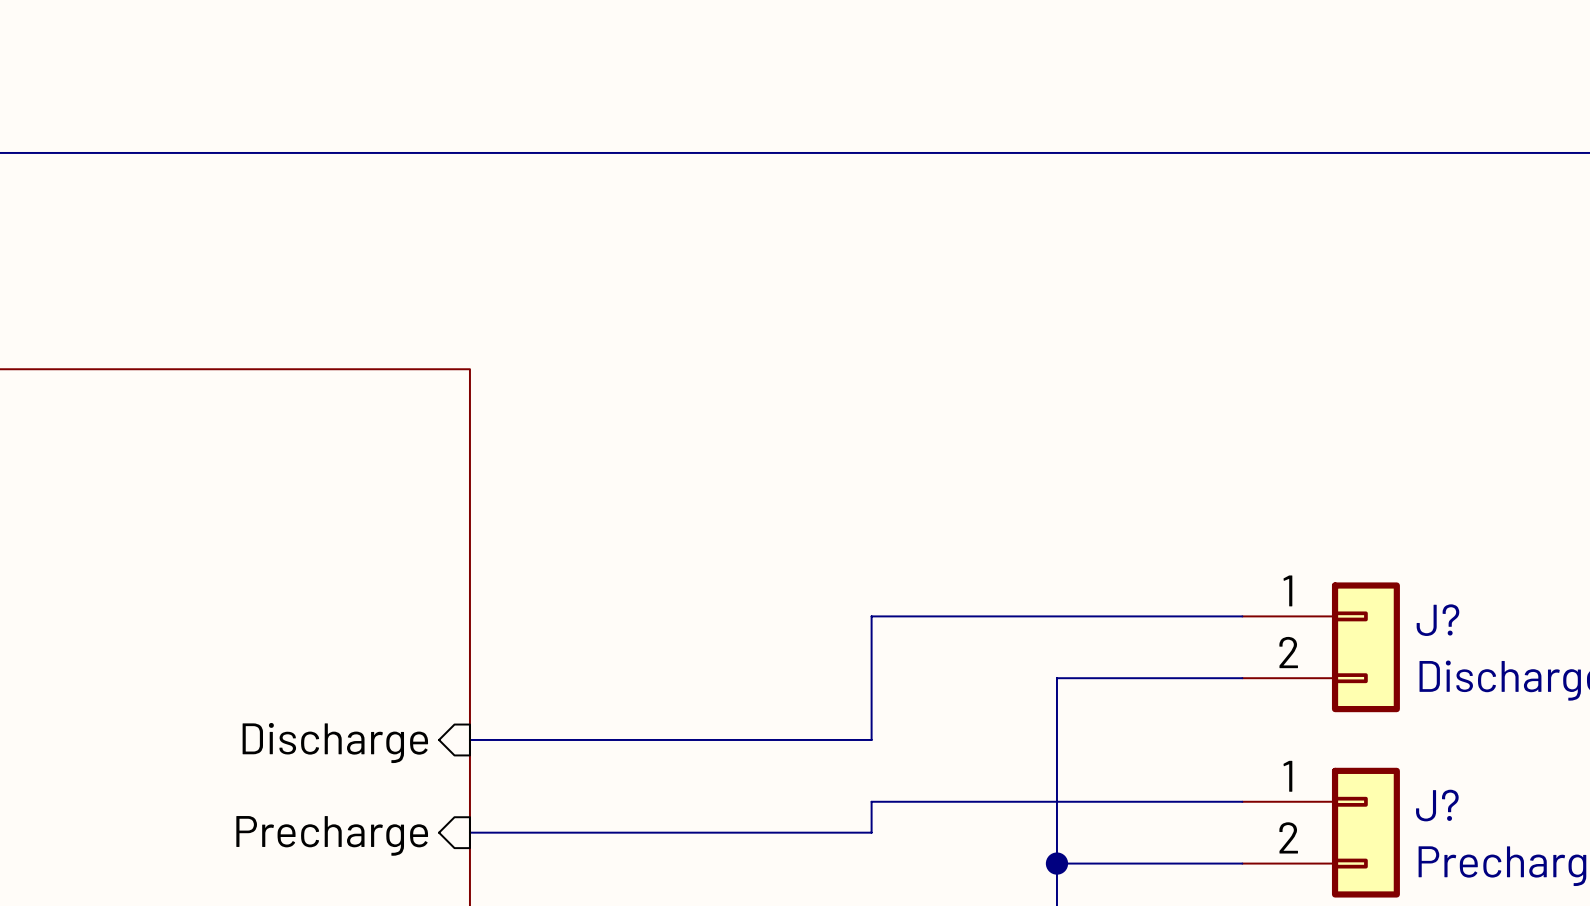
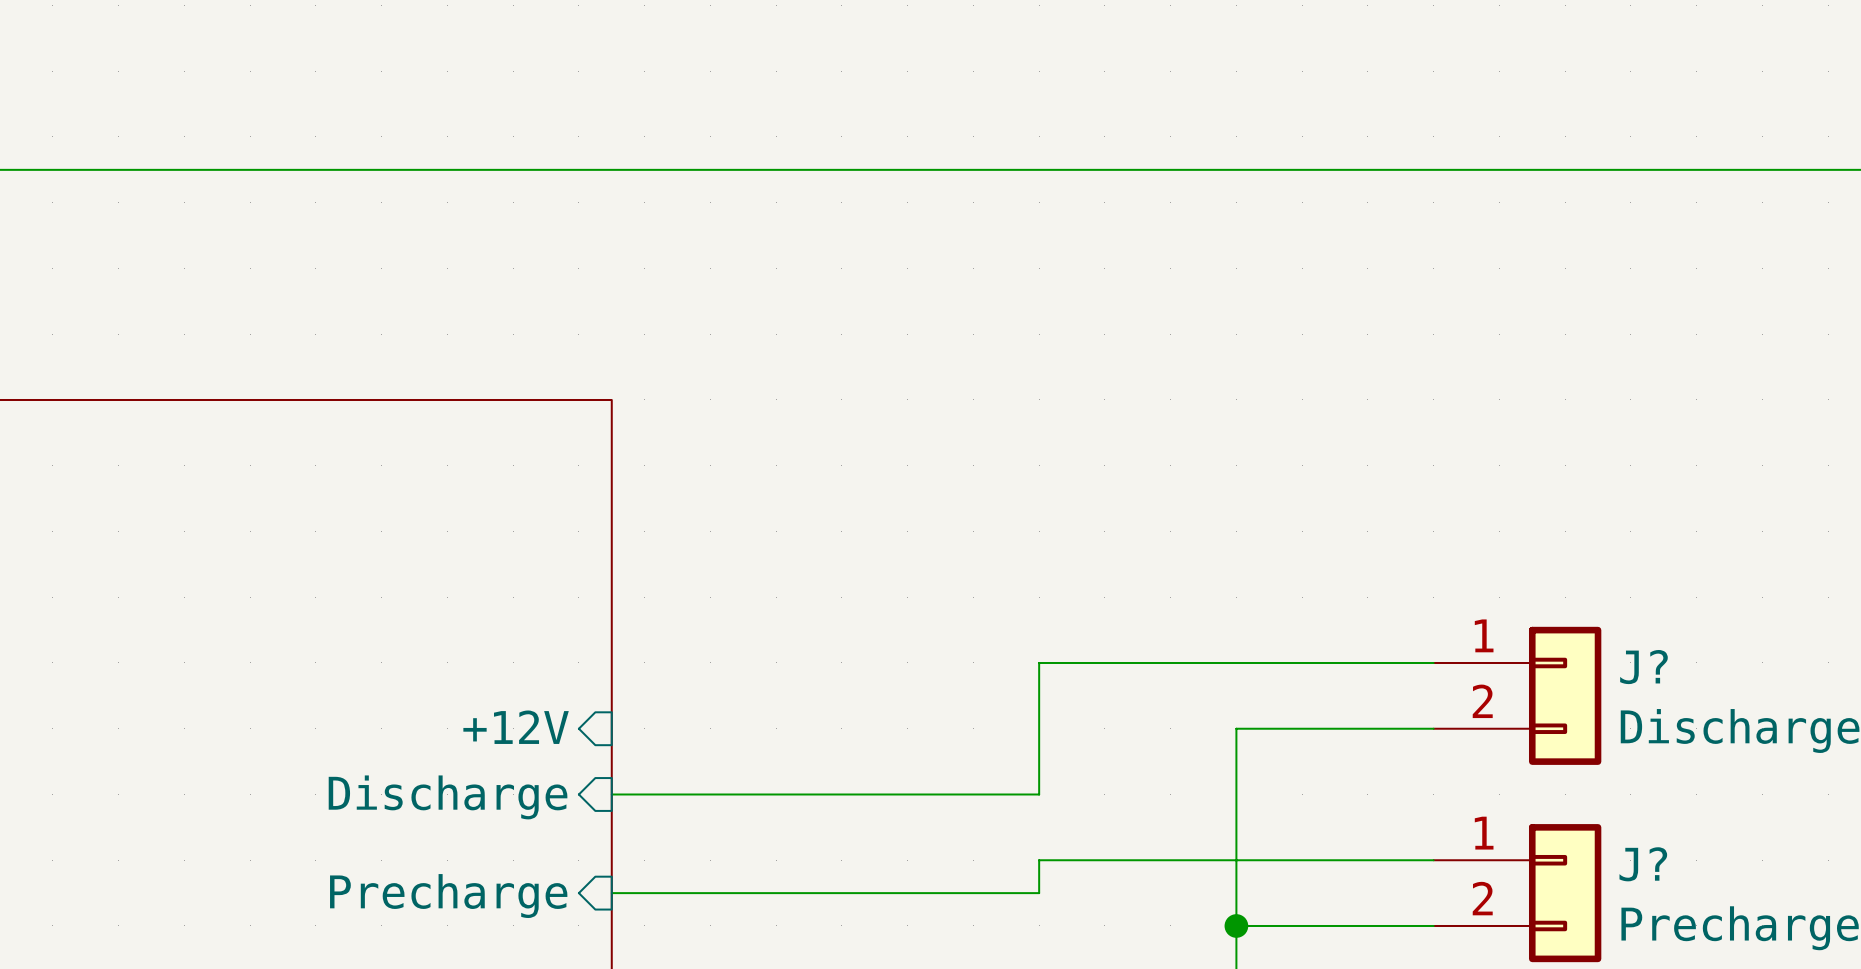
sheet pin: none -> +12V (516, 727)

